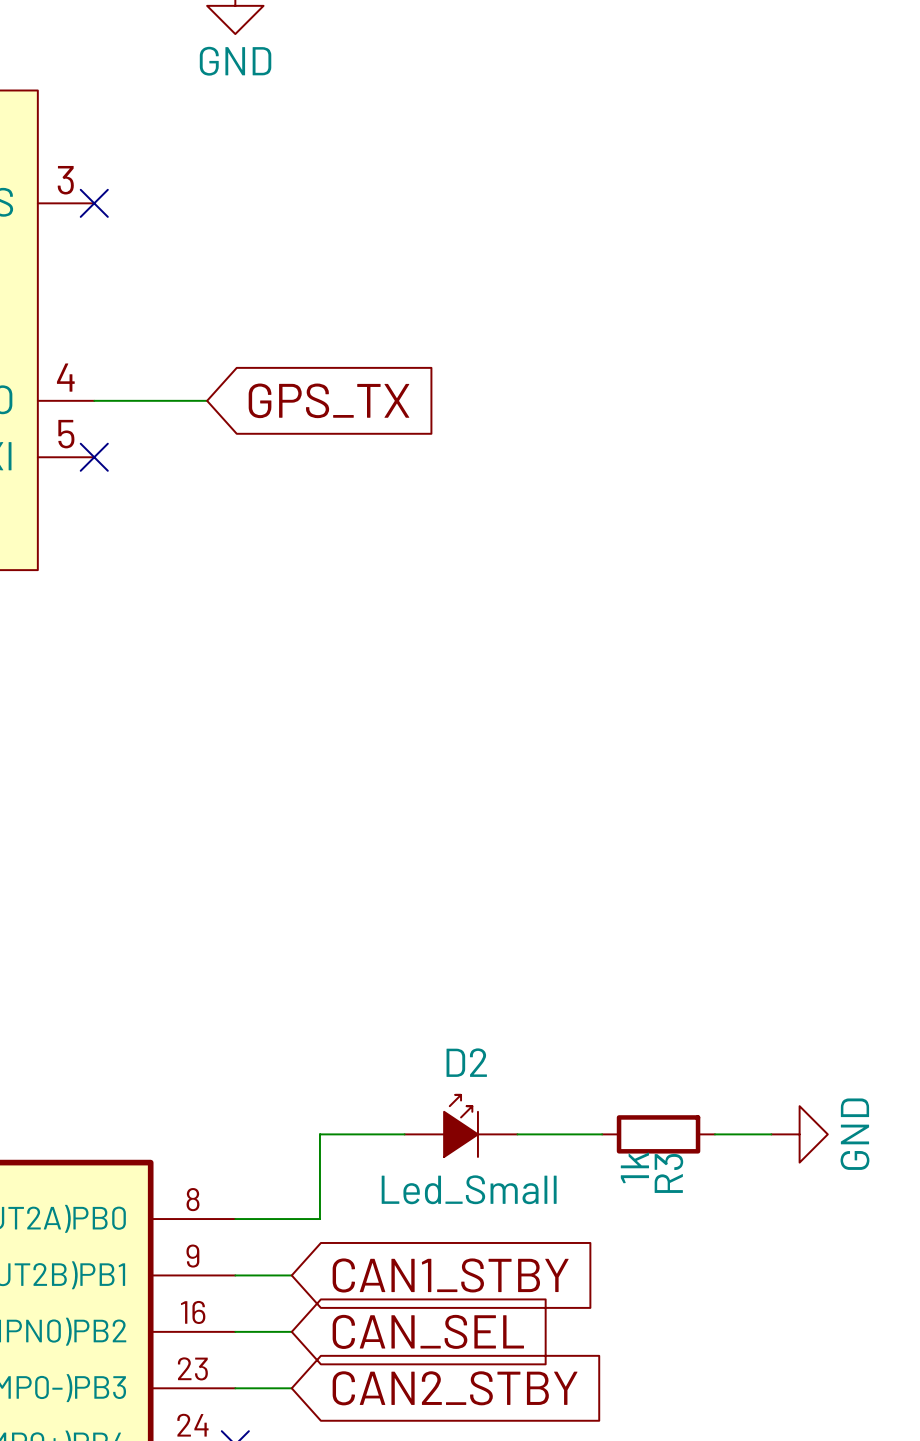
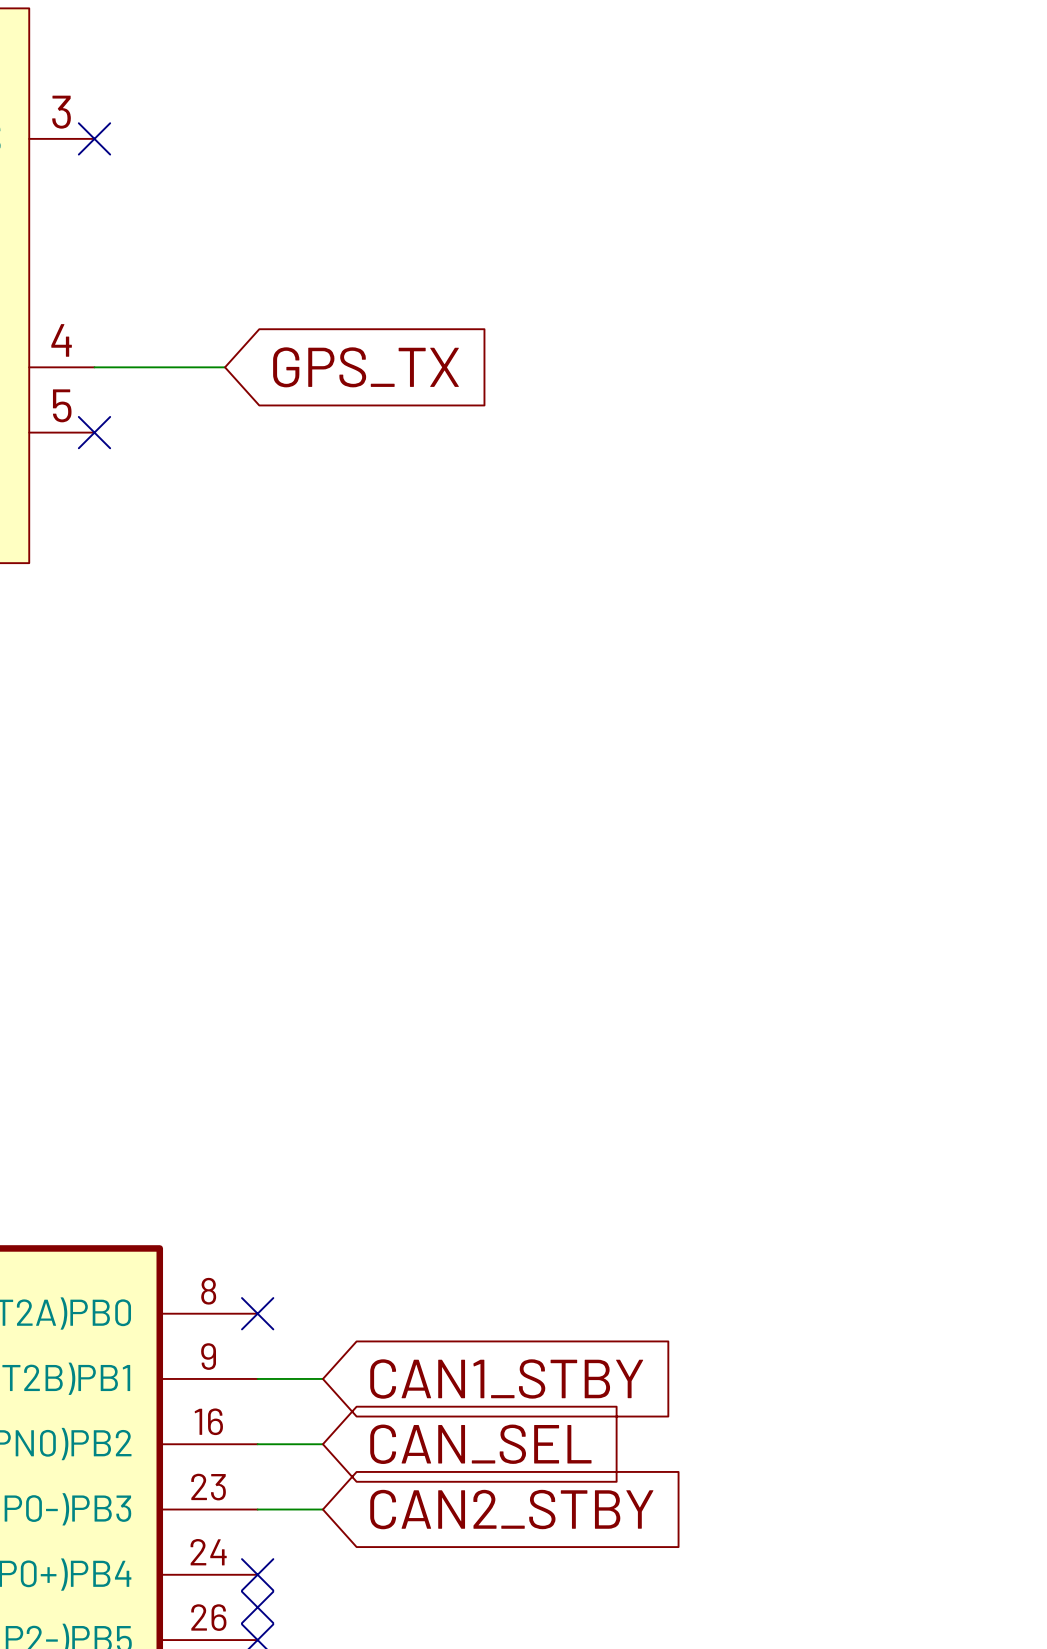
D2: Led_Small (461, 1125) -> none
wire: (404, 1134) (319, 1134) (319, 1219) (235, 1219) -> none
wire: (517, 1134) (602, 1134) -> none
R3: 1k (658, 1134) -> none
wire: (714, 1134) (771, 1134) -> none
power symbol: GND (799, 1134) -> none
no-connect mark: none -> (257, 1313)

